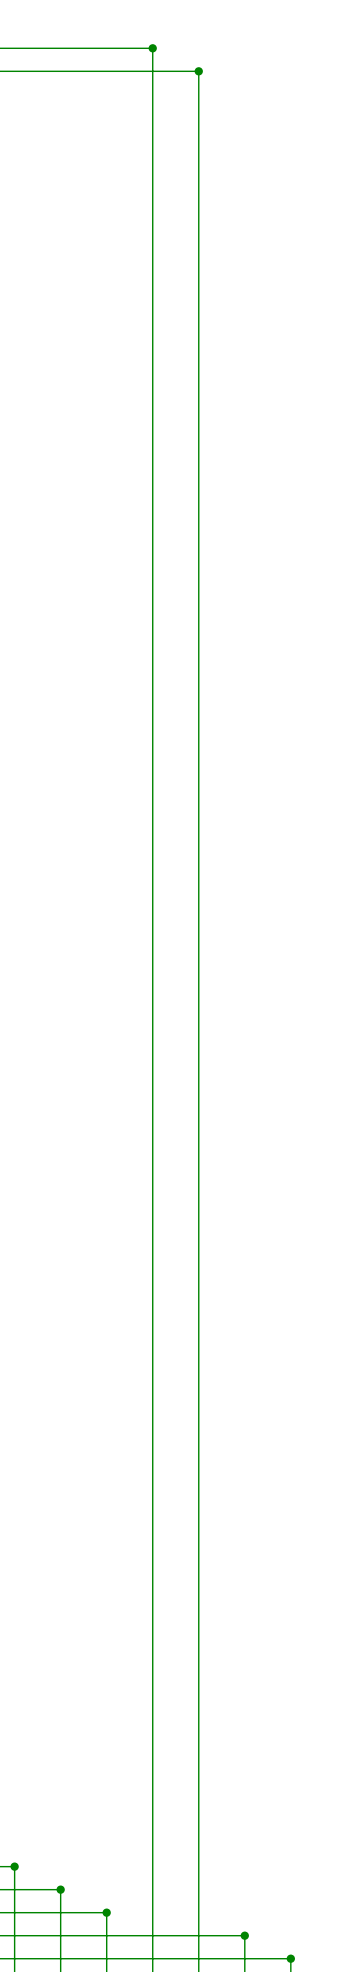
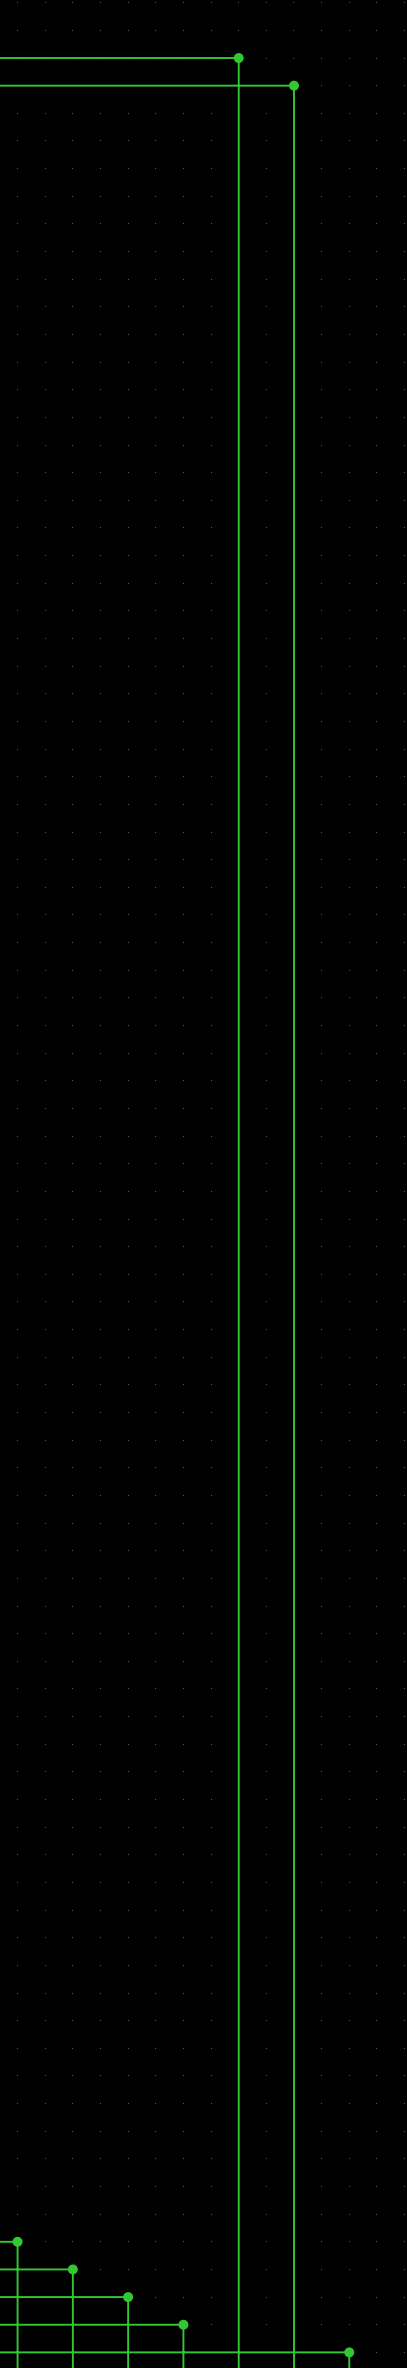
wire: (152, 48) (152, 1935) (244, 1935) -> (183, 58) (238, 58) (238, 85) (293, 85) (293, 2324)
junction: (152, 48) -> none
junction: none -> (238, 58)
junction: (198, 71) -> none
junction: none -> (293, 85)
junction: none -> (183, 2324)
junction: (244, 1935) -> none

